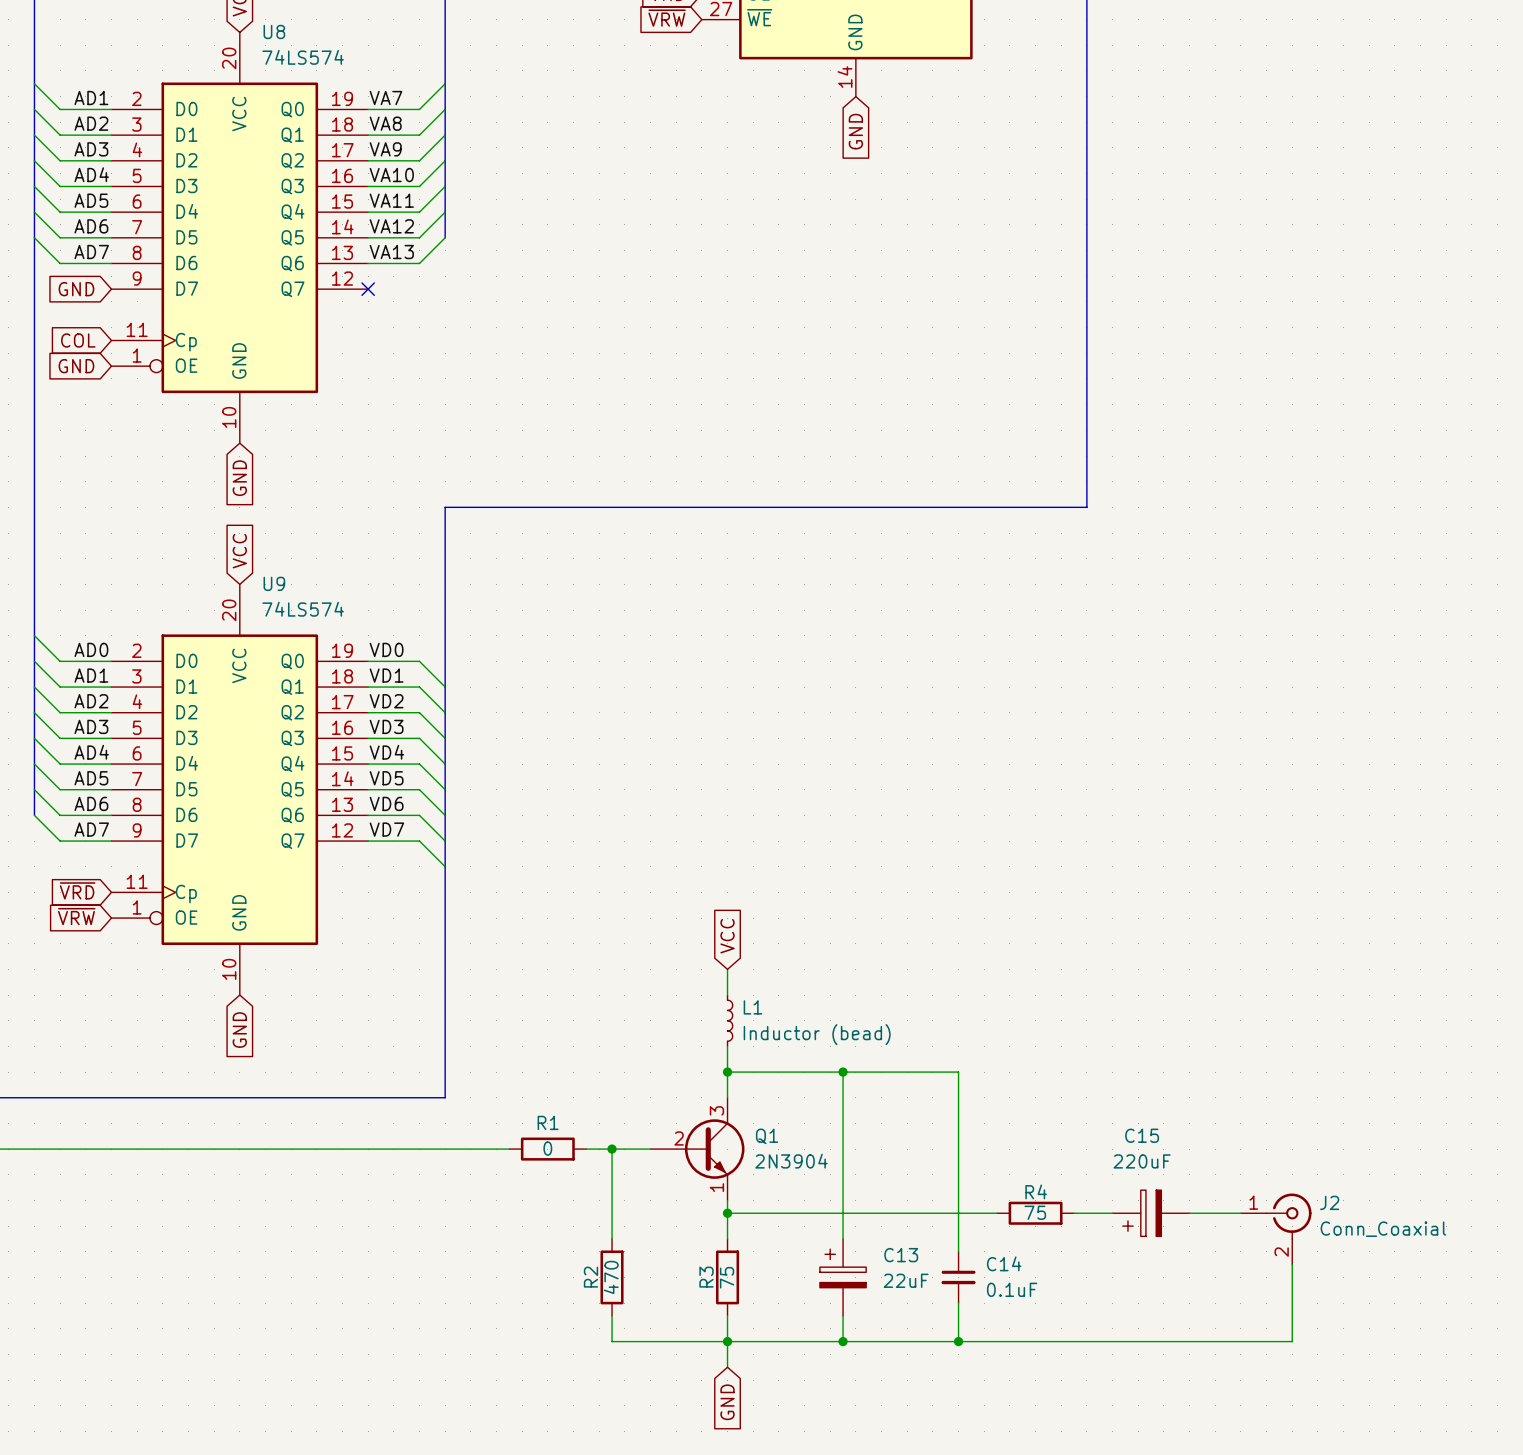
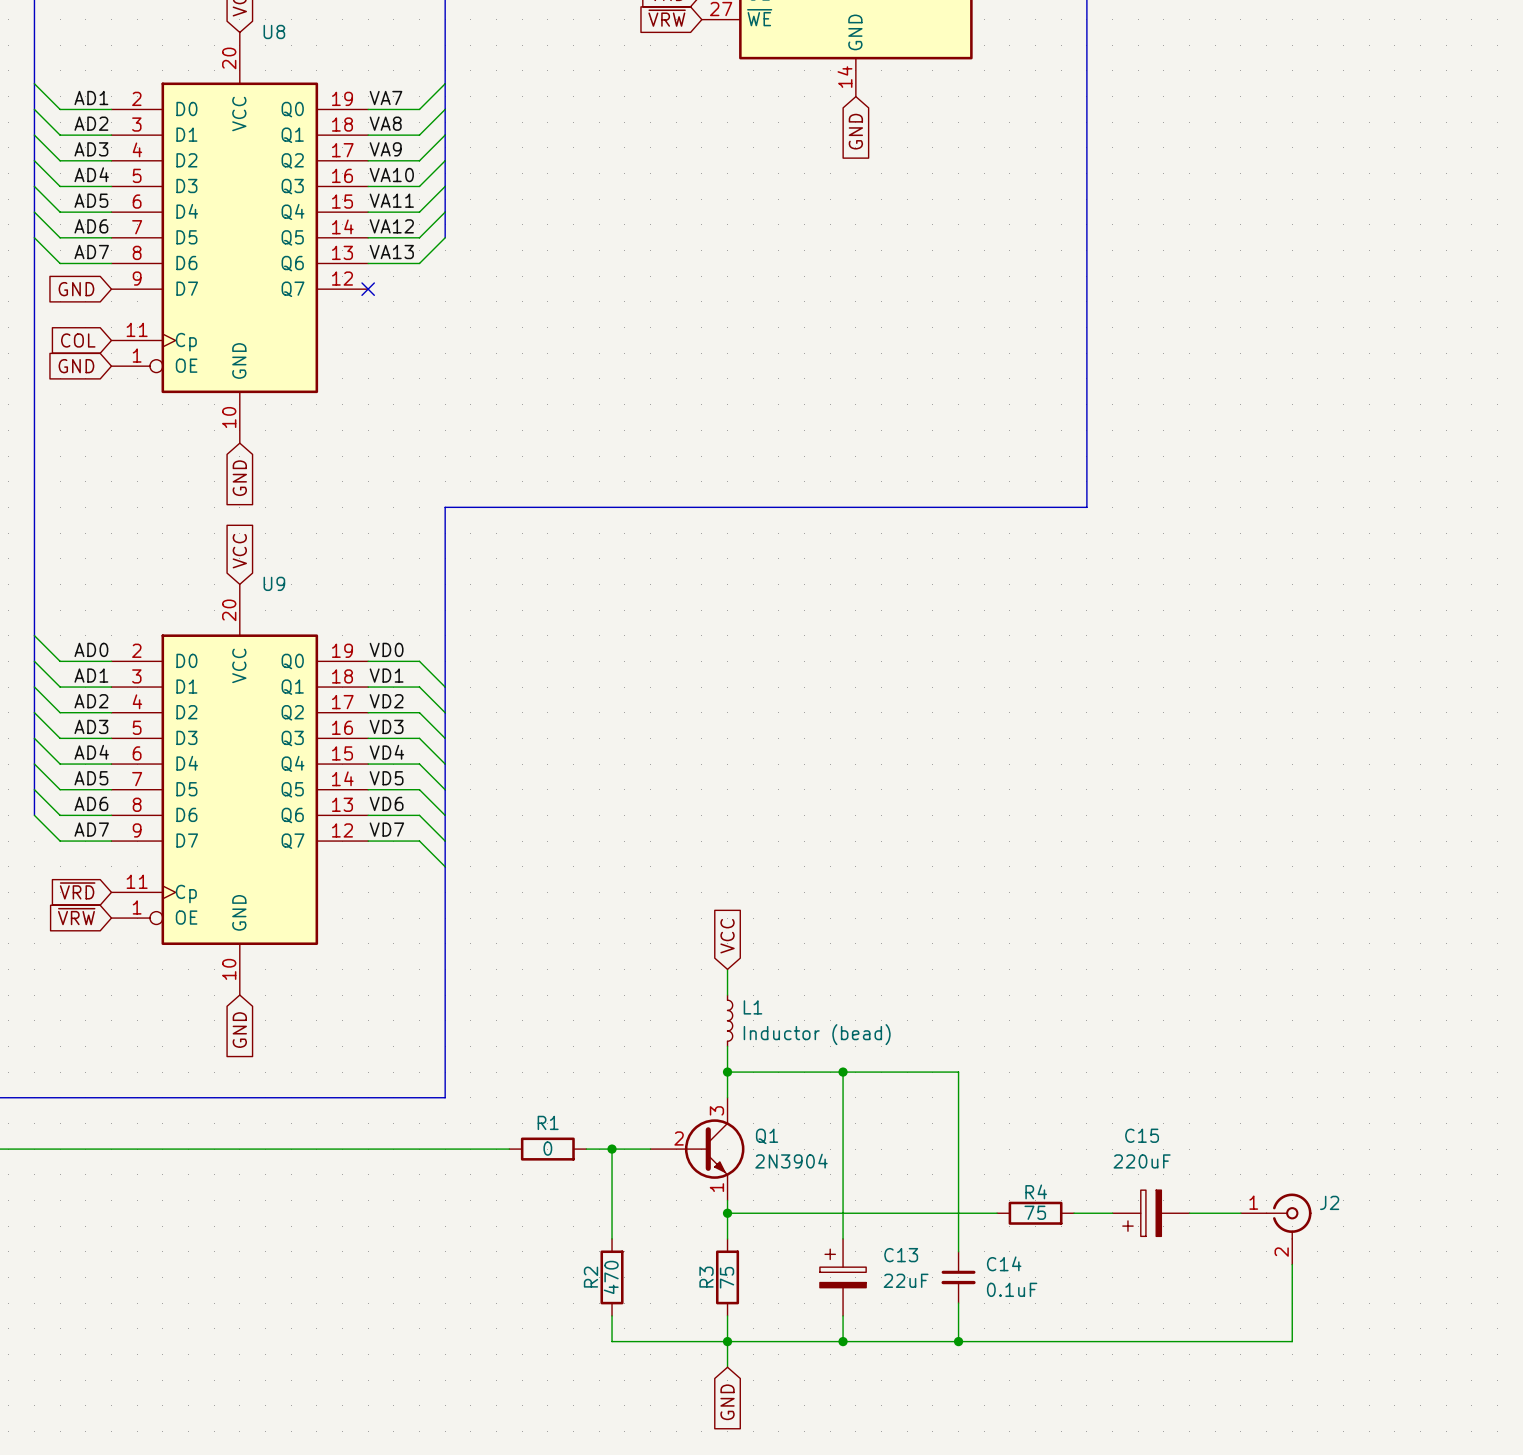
U8 value: 74LS574 (303, 57) -> none
U9 value: 74LS574 (303, 609) -> none
J2 value: Conn_Coaxial (1383, 1229) -> none

